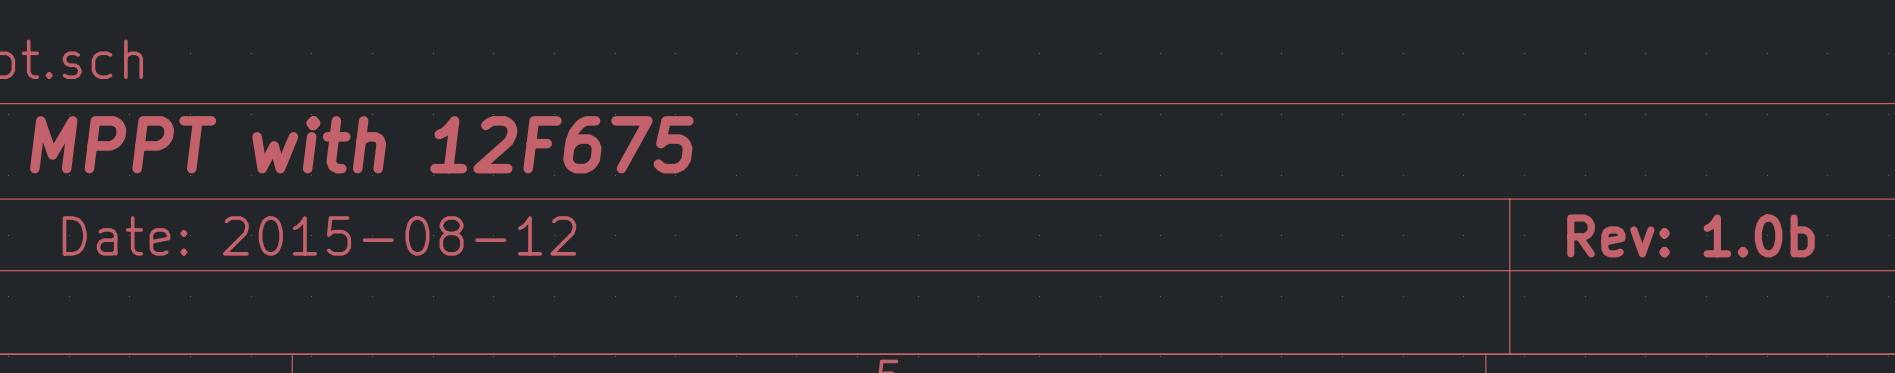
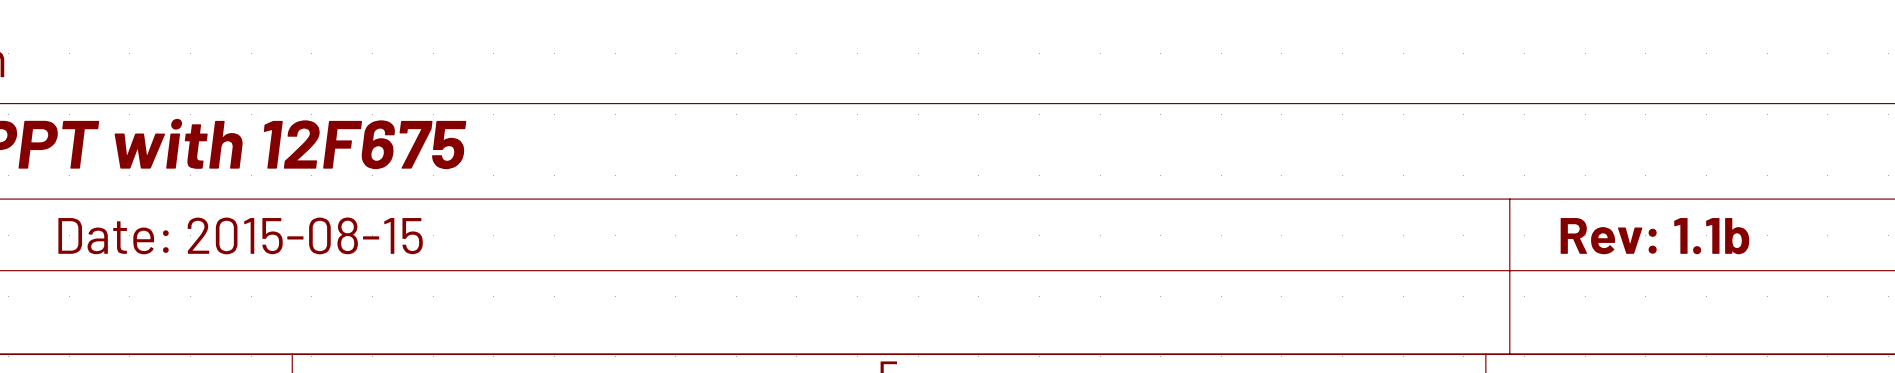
title block: Date: 2015-08-12 (319, 235) -> Date: 2015-08-15 (240, 235)
title block: Rev: 1.0b (1690, 235) -> Rev: 1.1b (1654, 236)

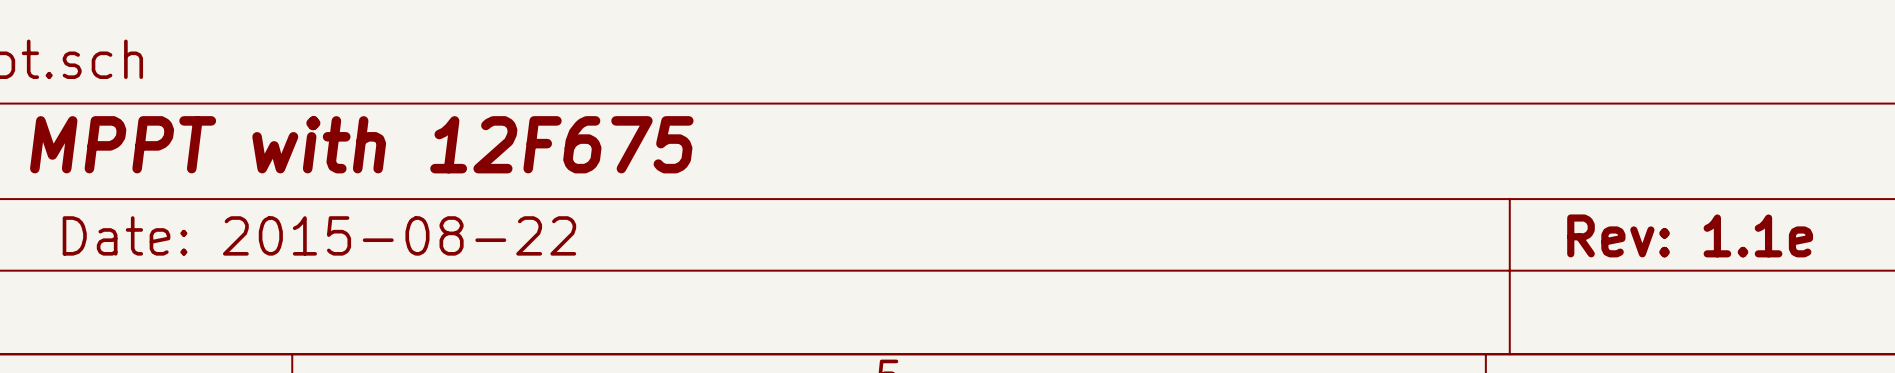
title block: Date: 2015-08-15 (240, 235) -> Date: 2015-08-22 (319, 235)
title block: Rev: 1.1b (1654, 236) -> Rev: 1.1e (1690, 235)

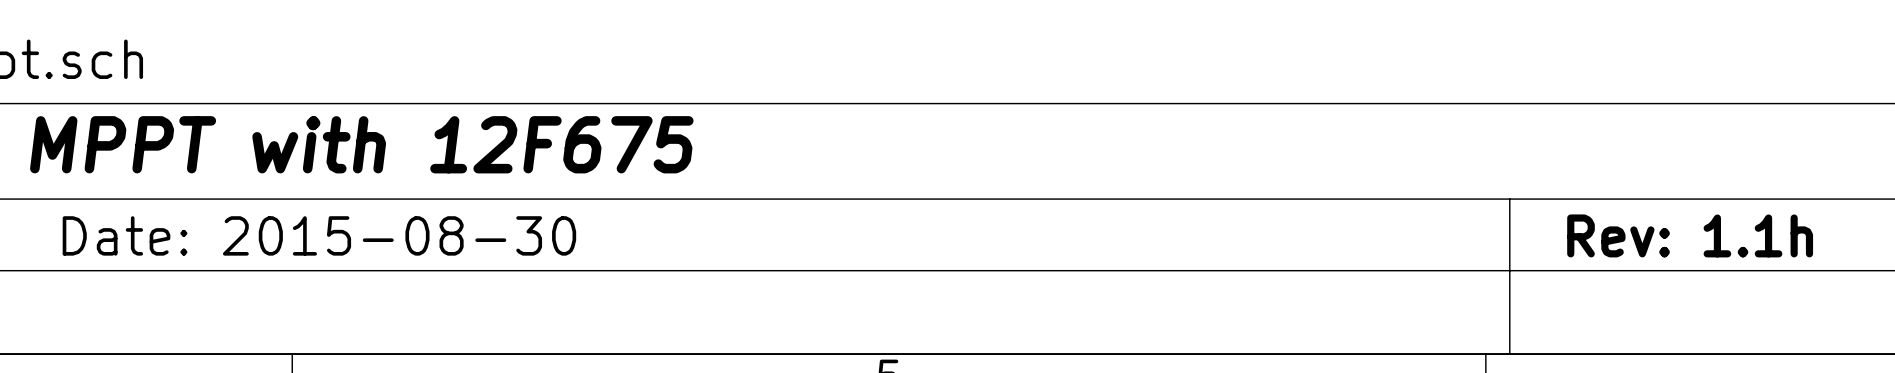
title block: Date: 2015-08-22 (319, 235) -> Date: 2015-08-30 (319, 235)
title block: Rev: 1.1e (1690, 235) -> Rev: 1.1h (1690, 235)

